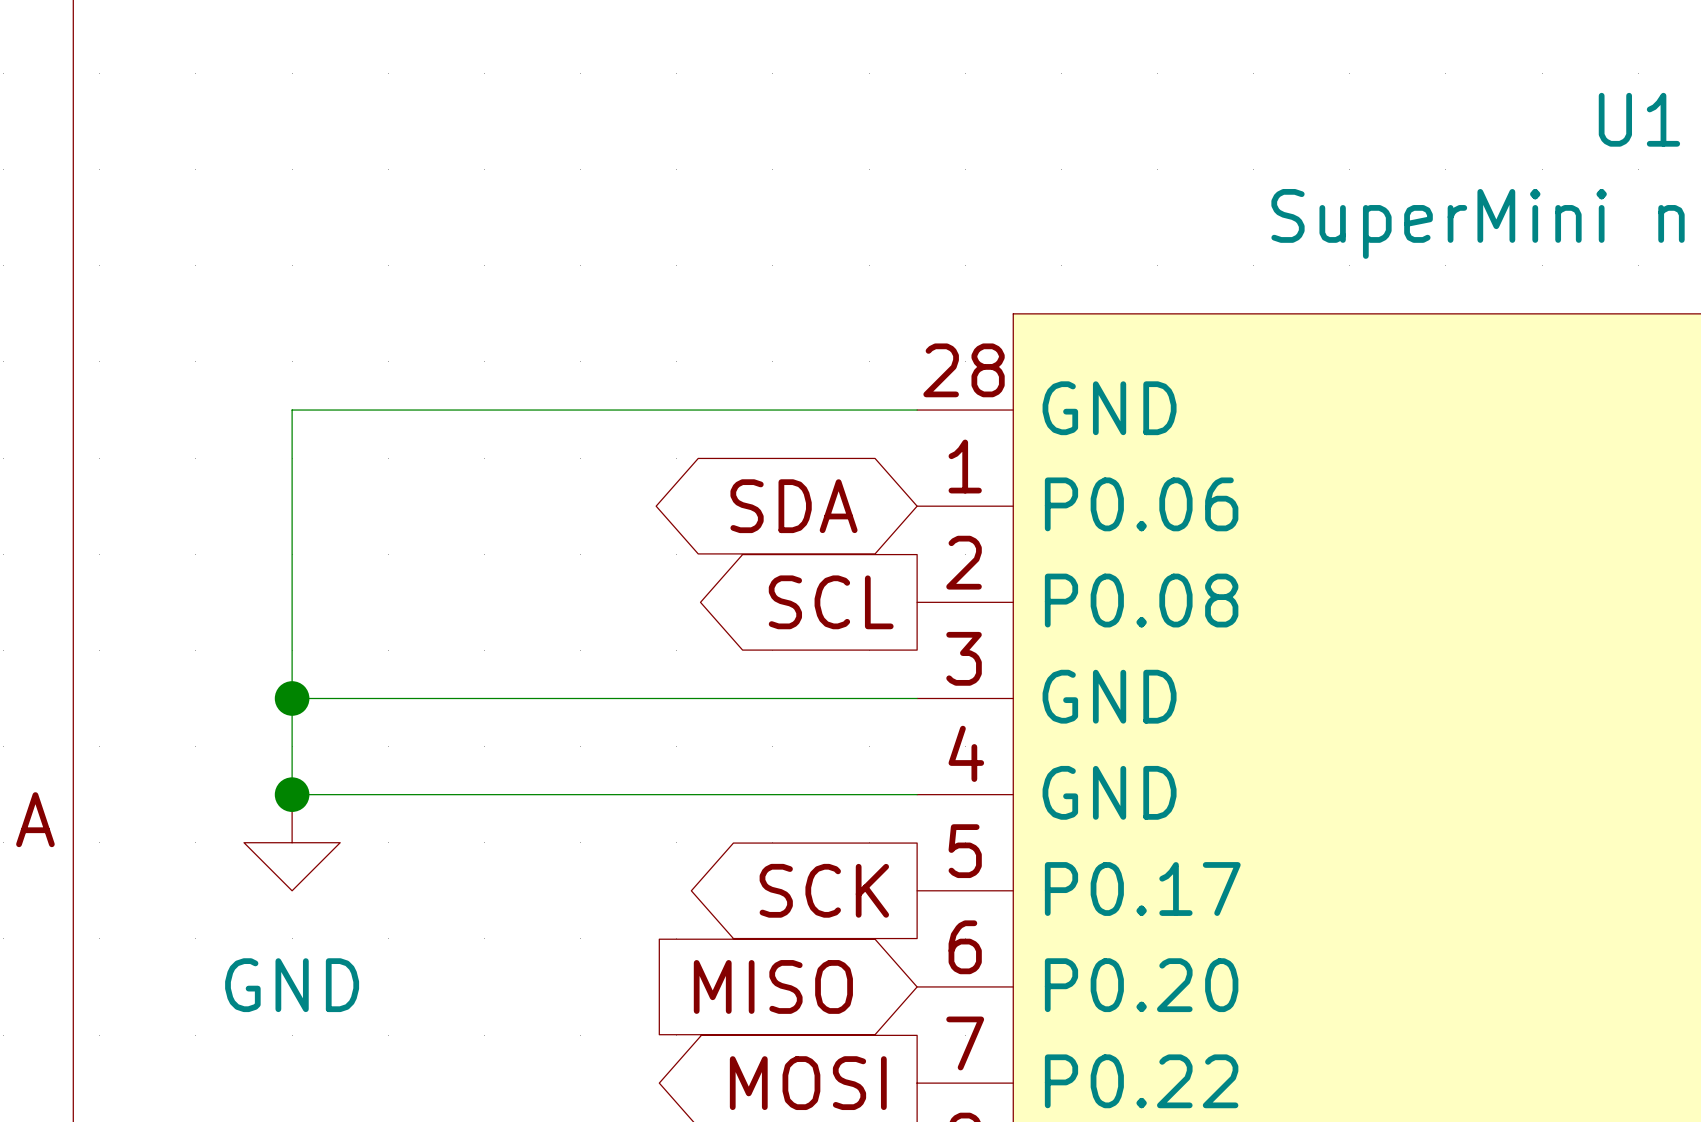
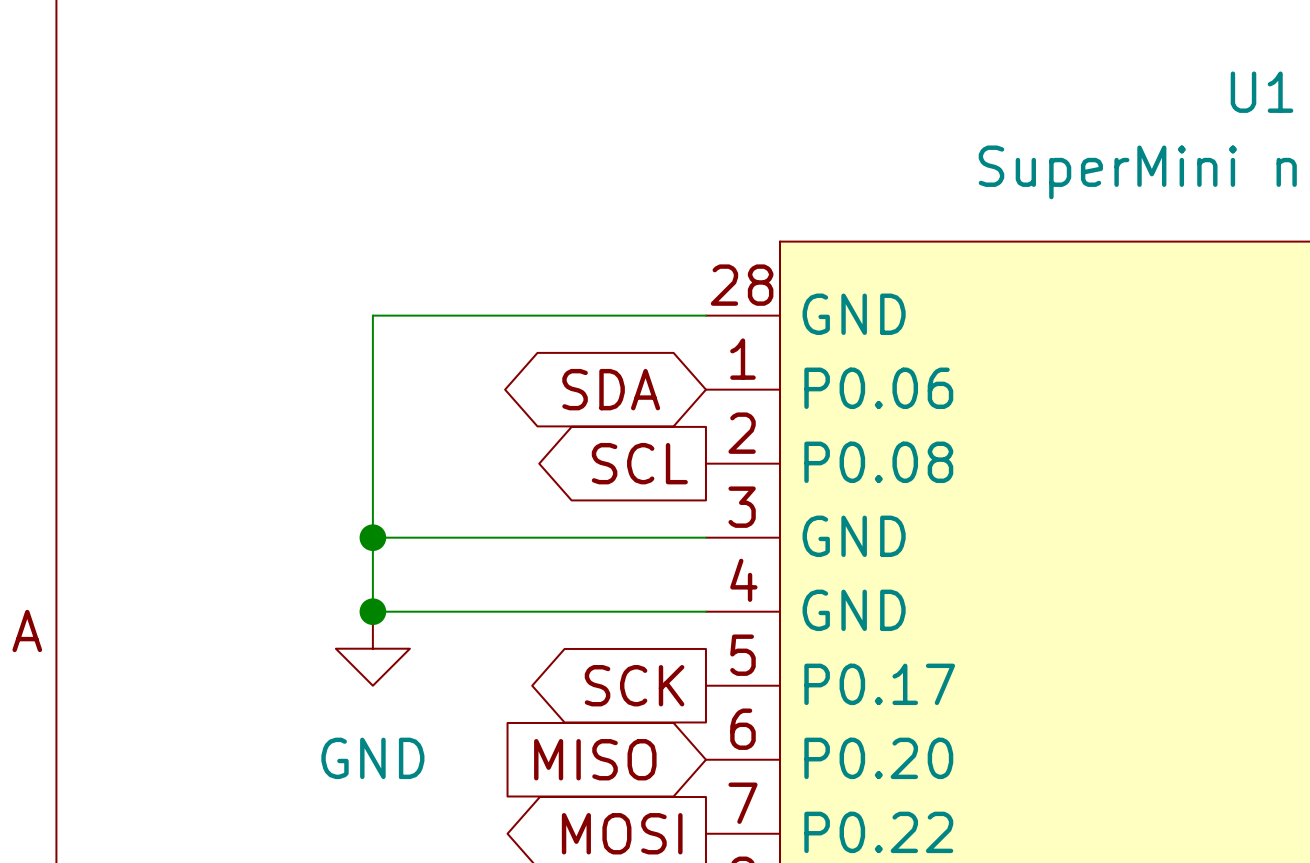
wire: (484, 410) (292, 410) (292, 794) (484, 794) -> (372, 315) (372, 611)
wire: (292, 698) (484, 698) -> none
junction: (292, 698) -> none
junction: none -> (372, 537)
junction: (292, 794) -> none
junction: none -> (372, 611)
power symbol position: GND (292, 842) -> GND (372, 648)

